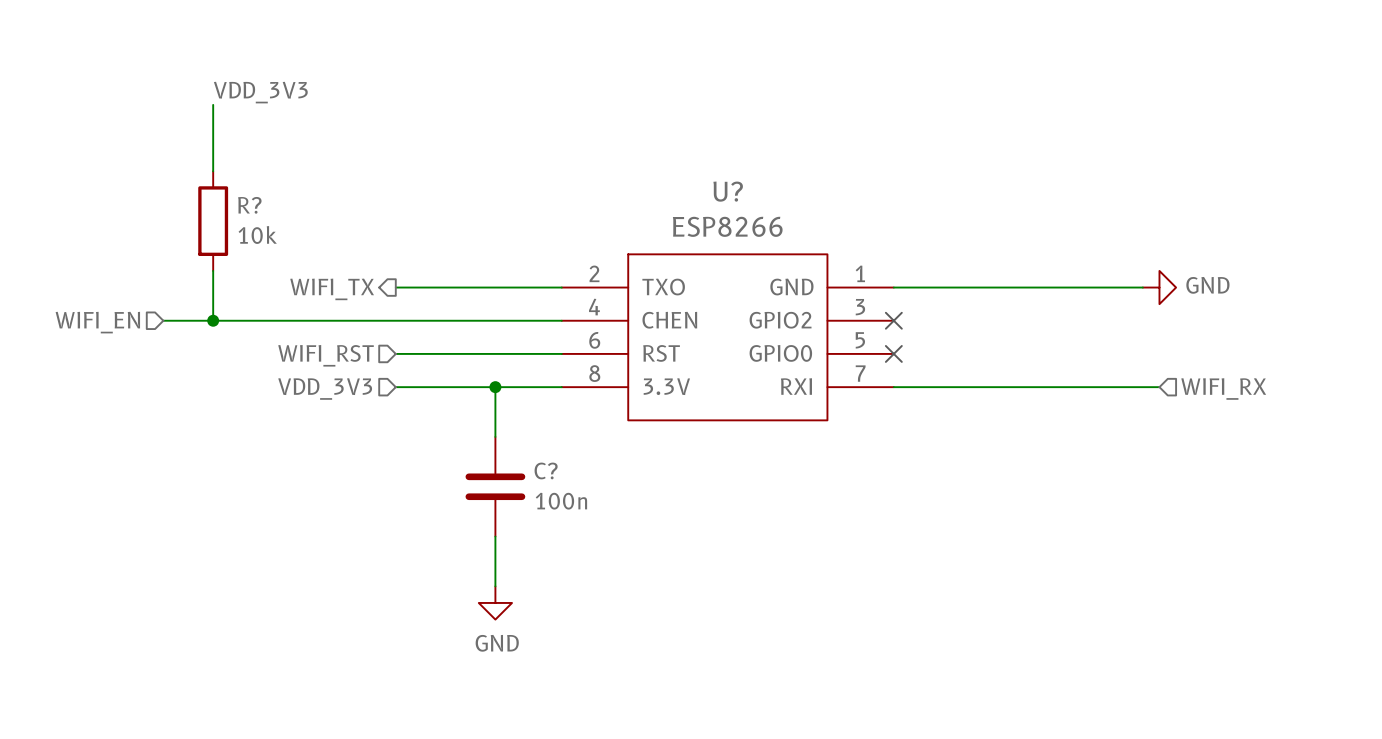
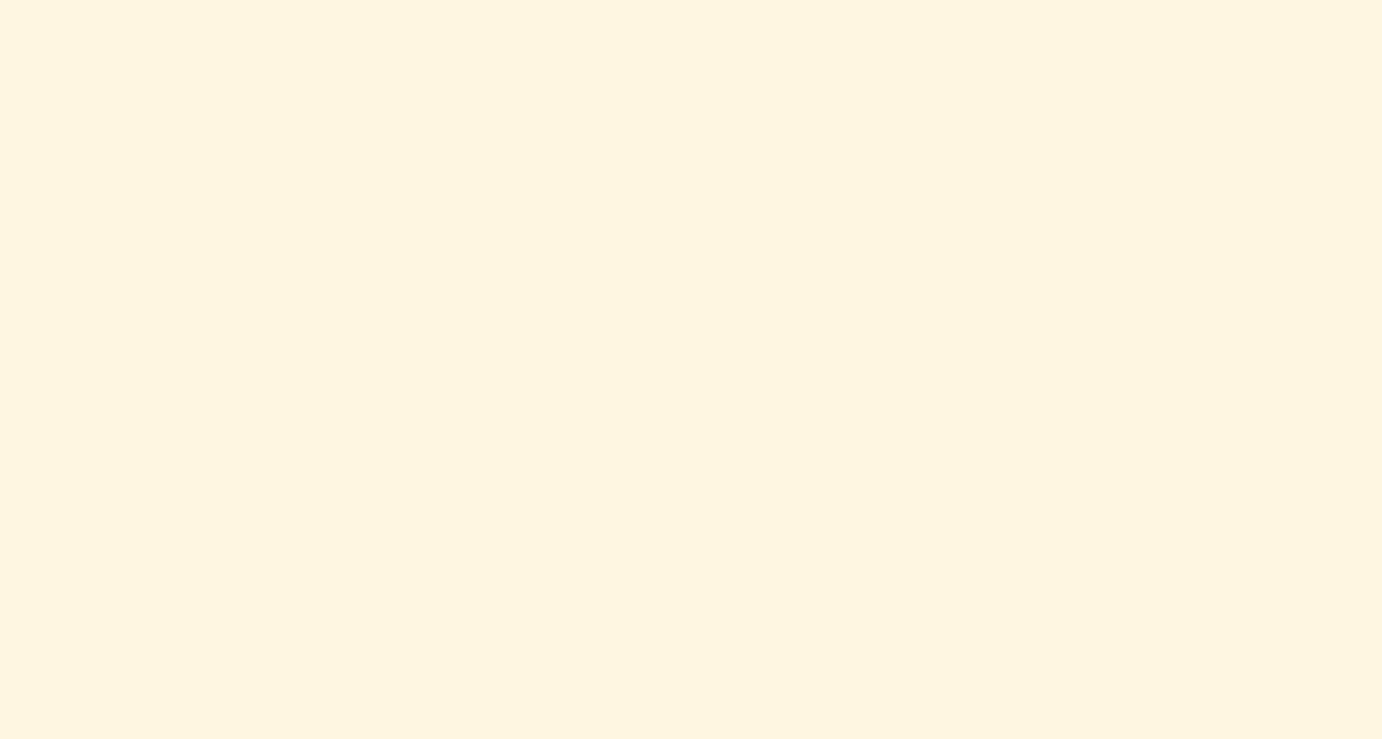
label: VDD_3V3 (260, 92) -> none
wire: (213, 104) (213, 171) -> none
R?: 10k (213, 221) -> none
wire: (213, 270) (213, 320) -> none
wire: (395, 287) (561, 287) -> none
wire: (893, 287) (1142, 287) -> none
power symbol: GND (1159, 287) -> none
hierarchical label: WIFI_TX (332, 289) -> none
wire: (163, 320) (561, 320) -> none
junction: (213, 320) -> none
no-connect mark: (893, 320) -> none
hierarchical label: WIFI_EN (97, 322) -> none
U?: ESP8266 (727, 337) -> none
wire: (395, 353) (561, 353) -> none
no-connect mark: (893, 353) -> none
hierarchical label: WIFI_RST (326, 355) -> none
wire: (395, 387) (561, 387) -> none
wire: (495, 387) (495, 436) -> none
junction: (495, 387) -> none
wire: (893, 387) (1159, 387) -> none
hierarchical label: VDD_3V3 (325, 389) -> none
hierarchical label: WIFI_RX (1223, 389) -> none
C?: 100n (495, 486) -> none
wire: (495, 536) (495, 586) -> none
power symbol: GND (495, 602) -> none

